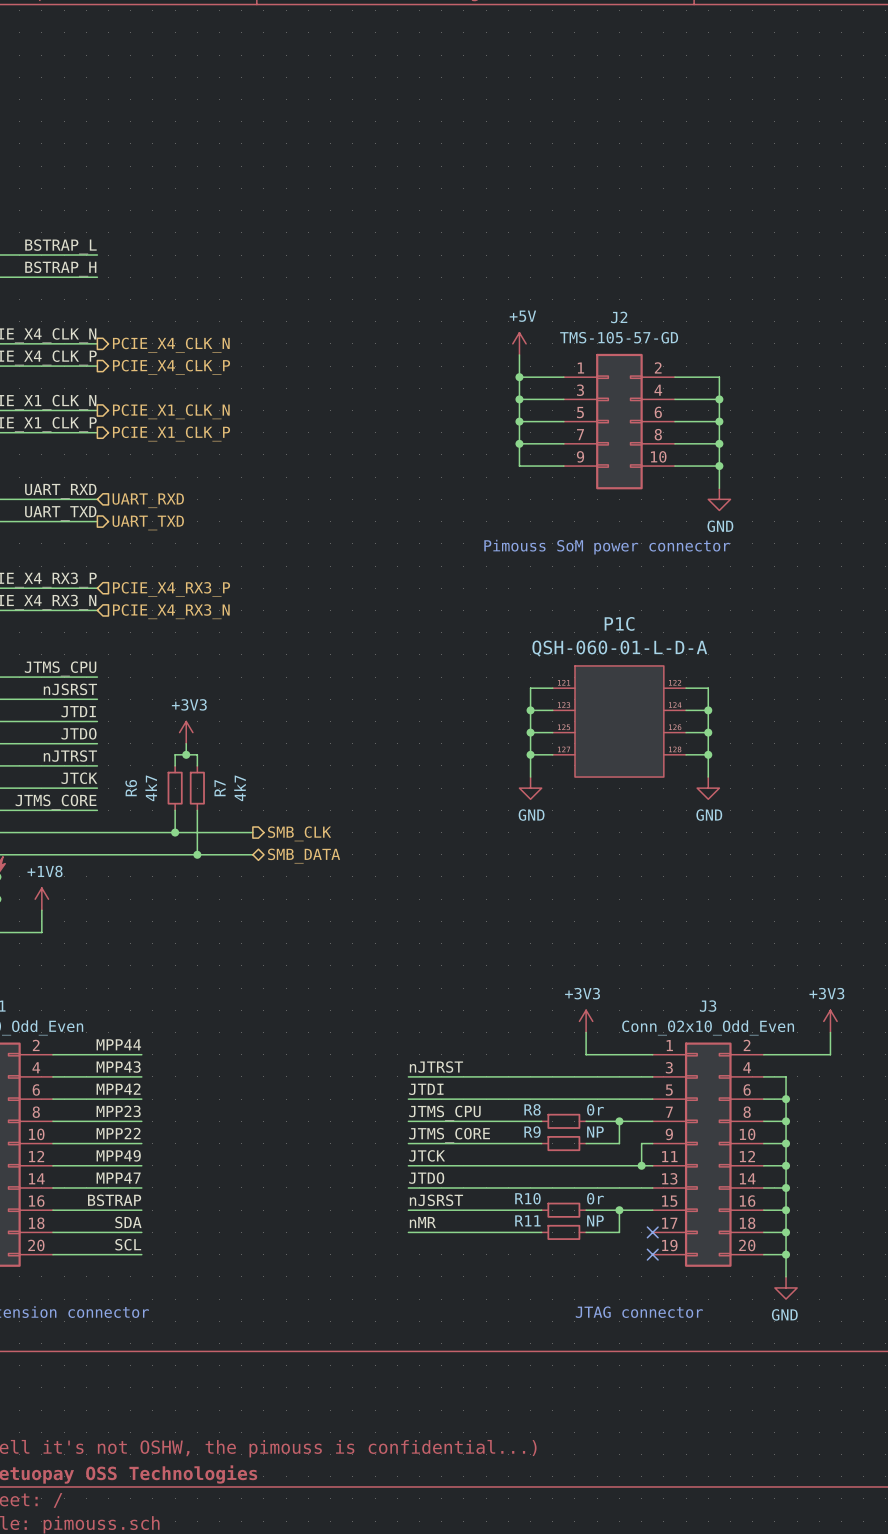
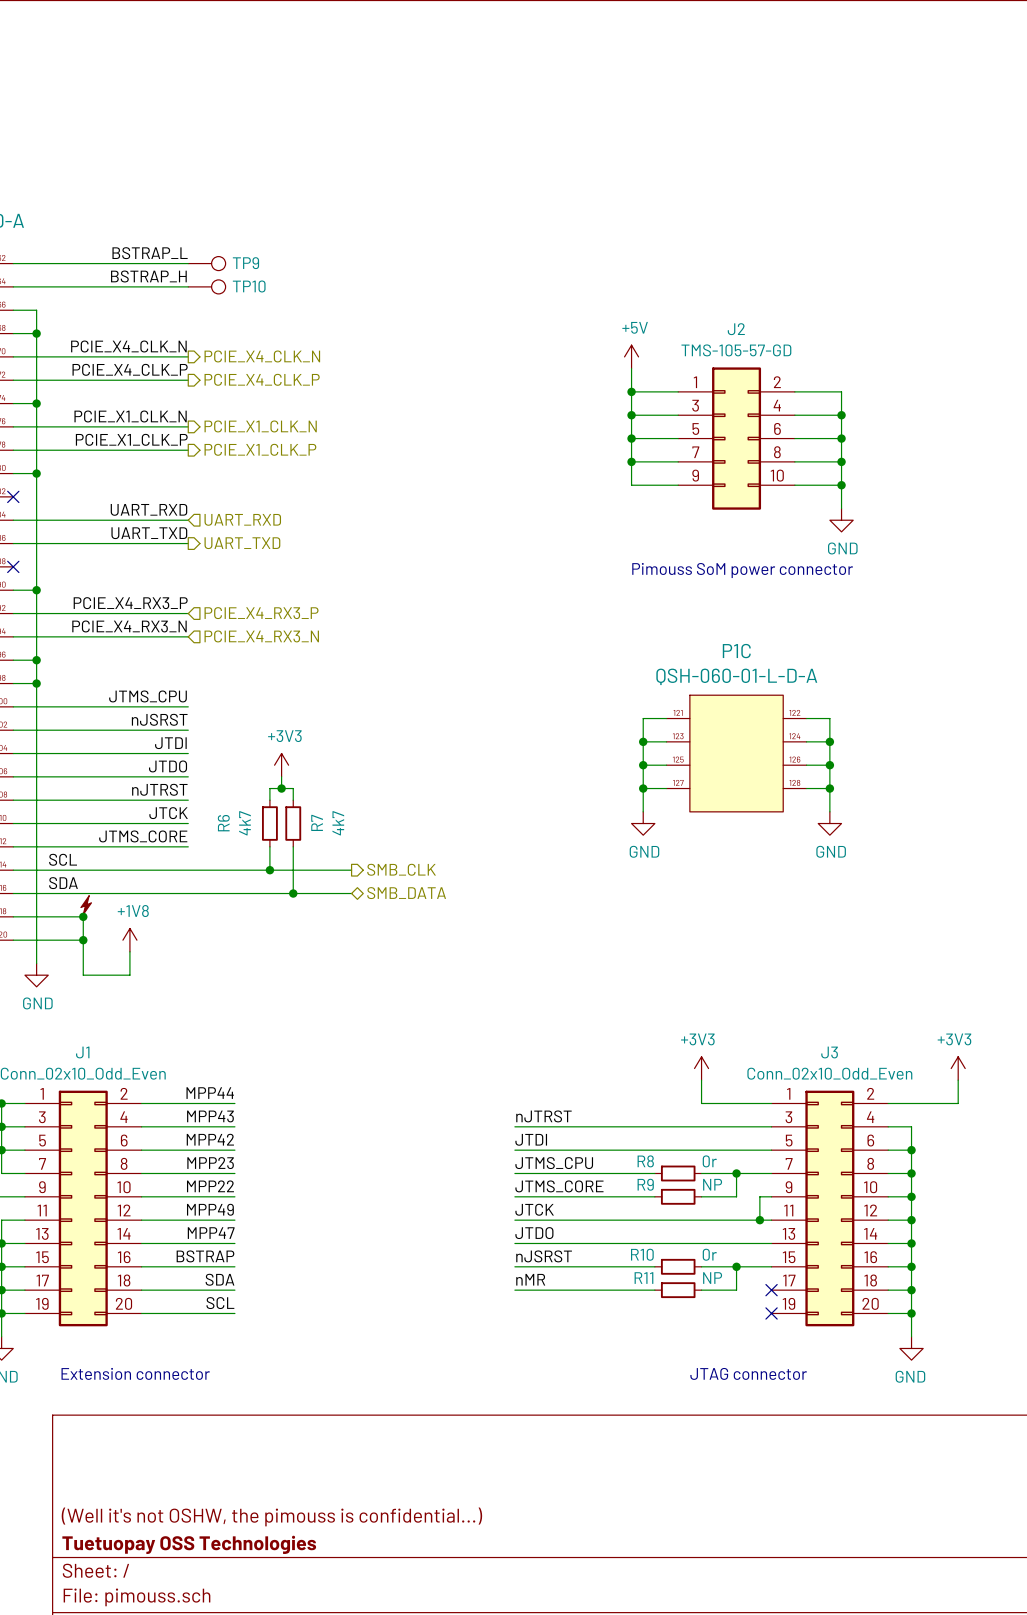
TP9: none -> (206, 263)
TP10: none -> (206, 286)

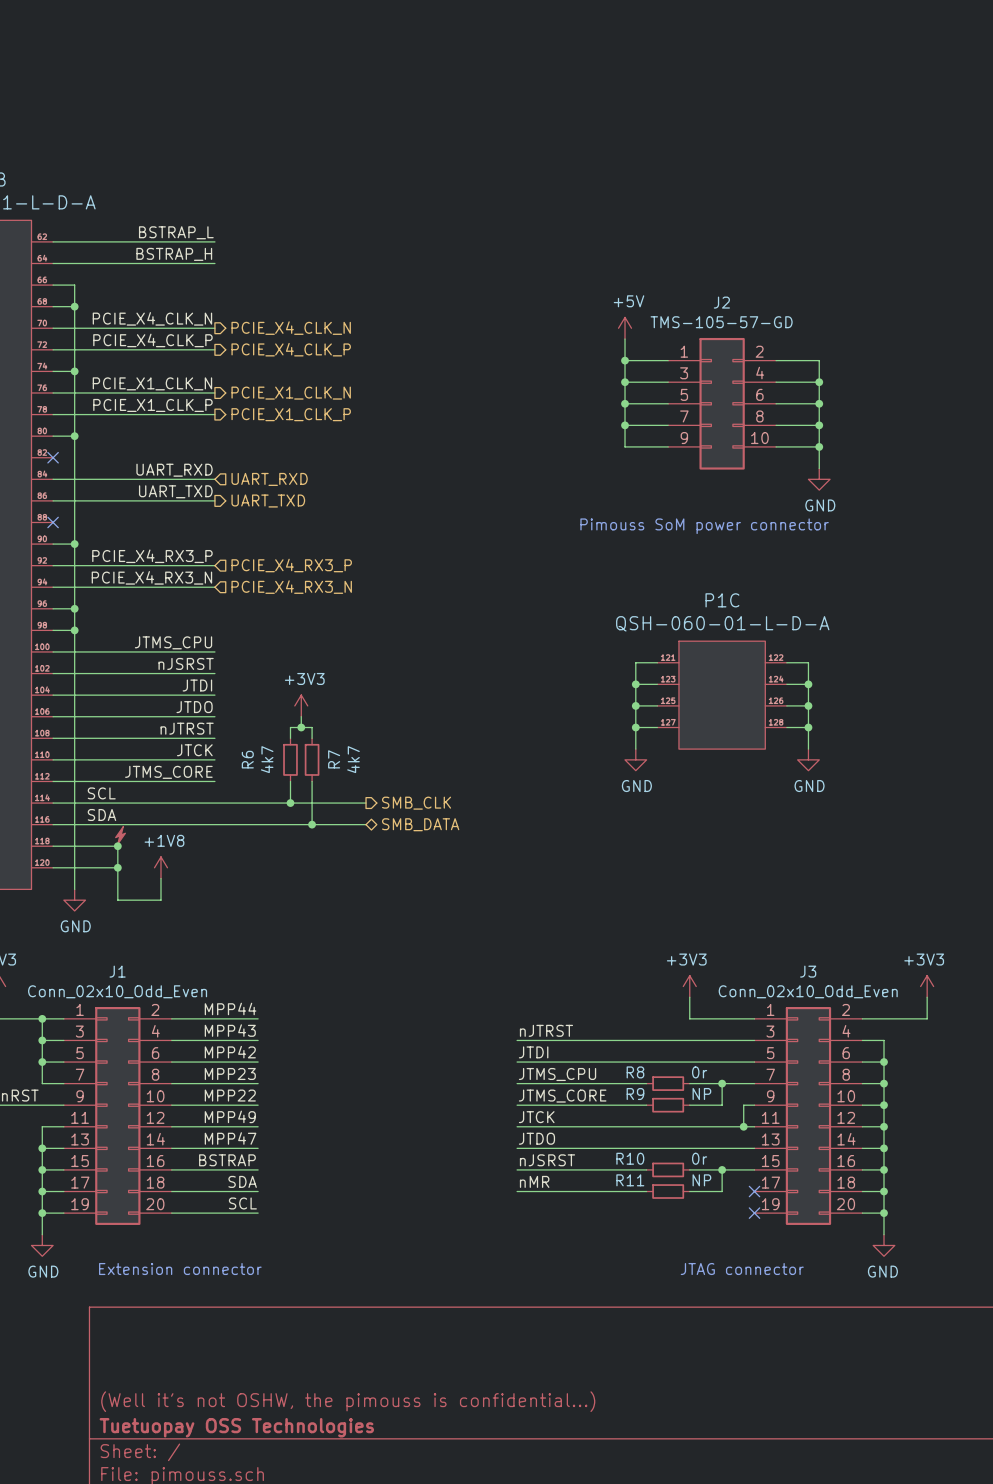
TP9: (206, 263) -> none
TP10: (206, 286) -> none

